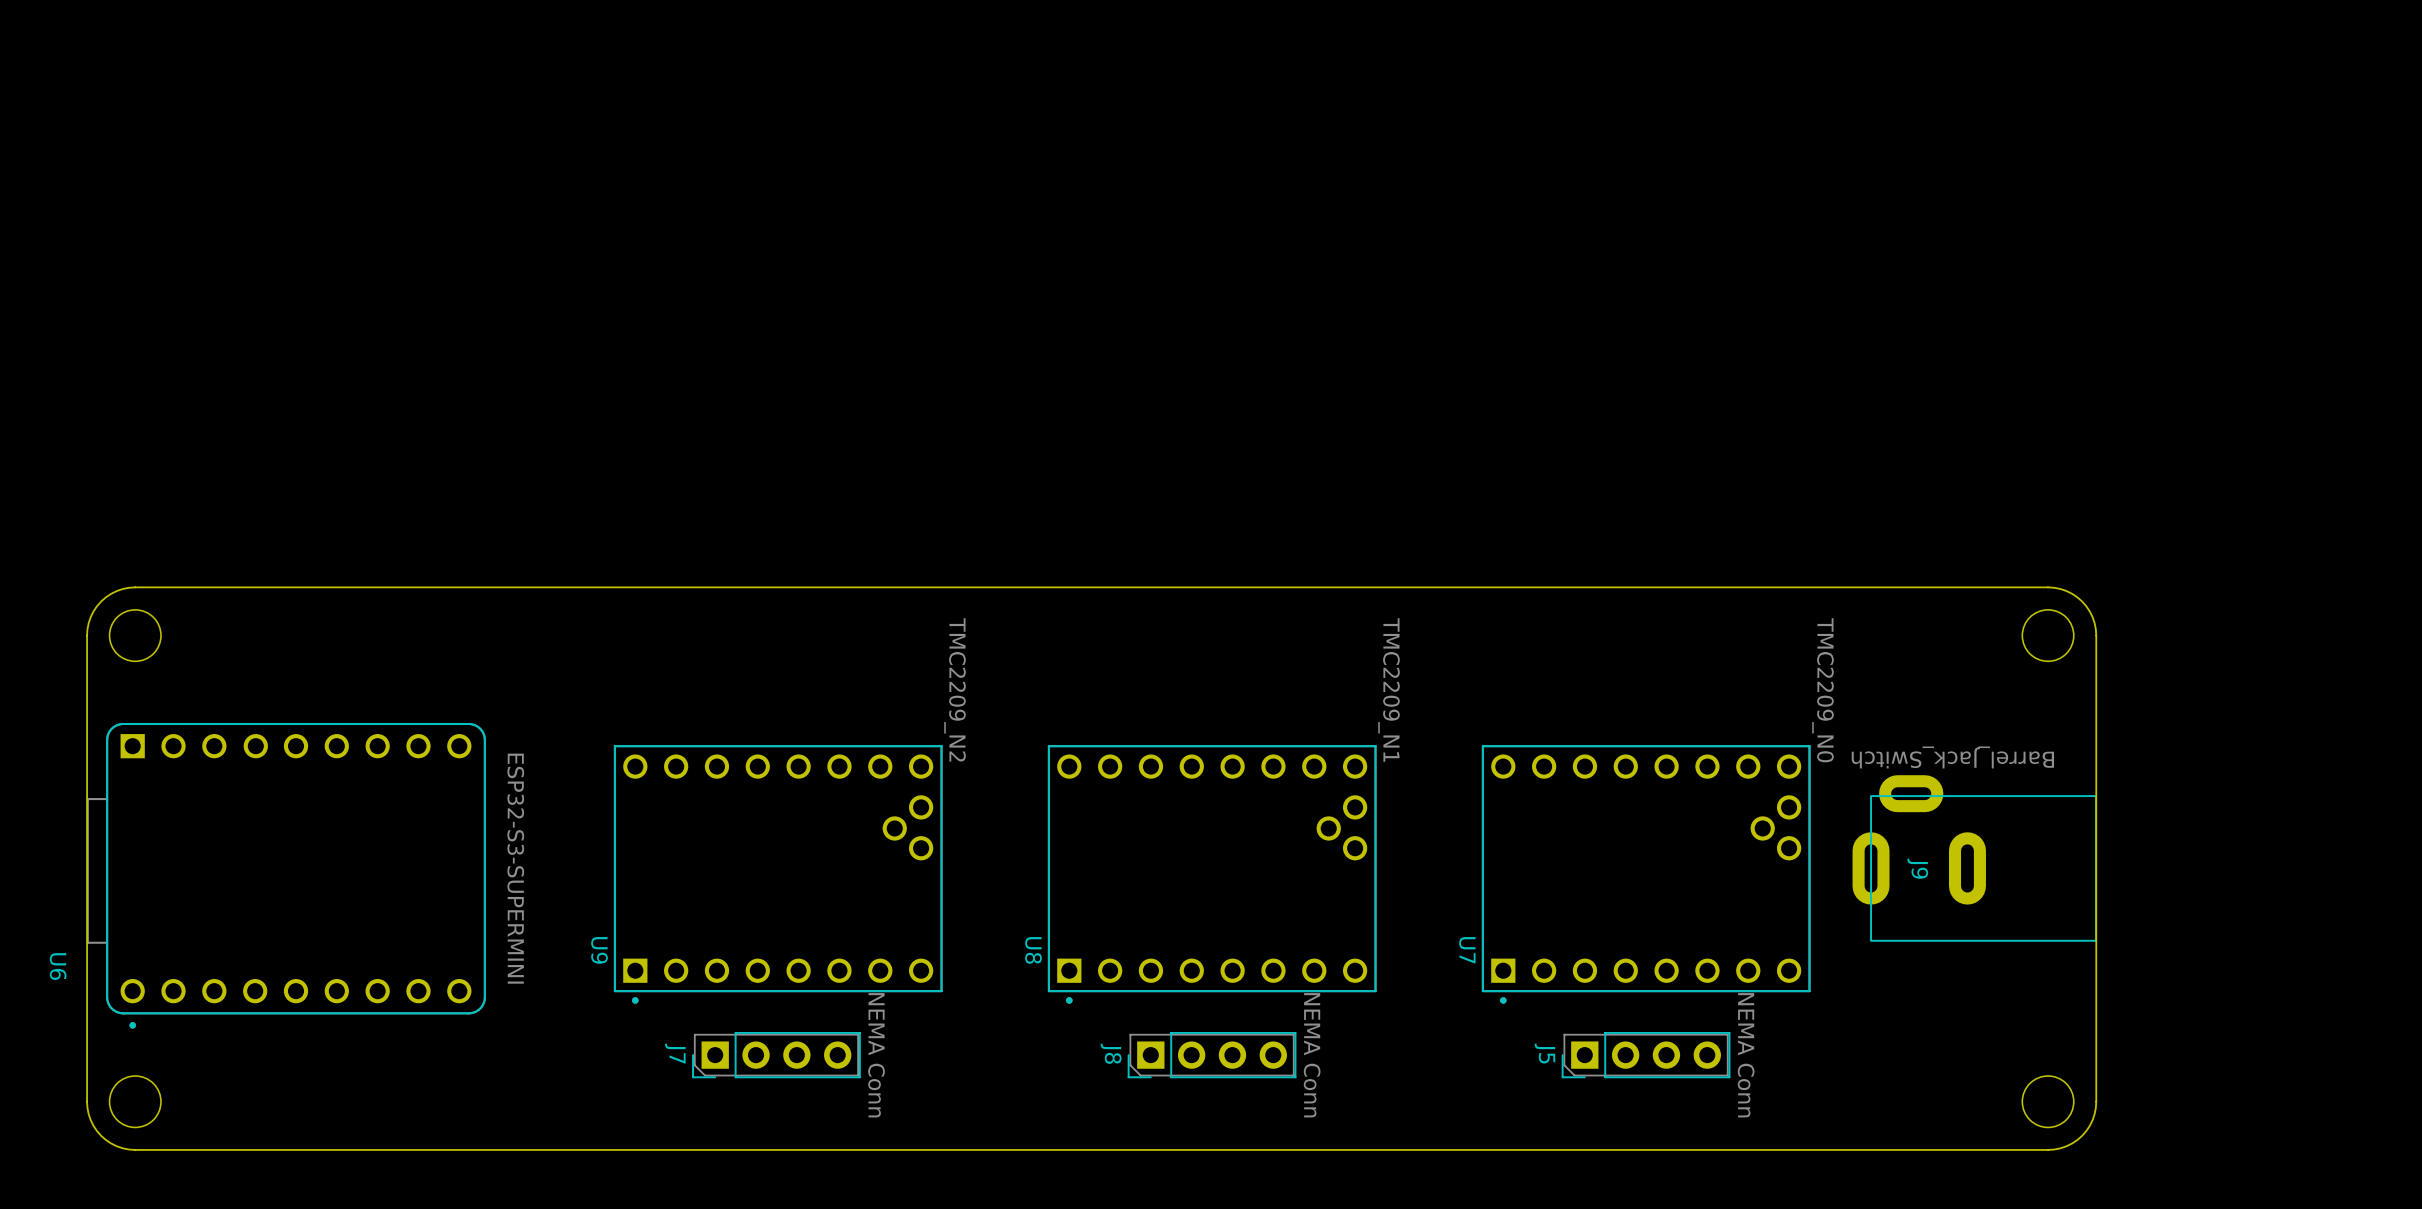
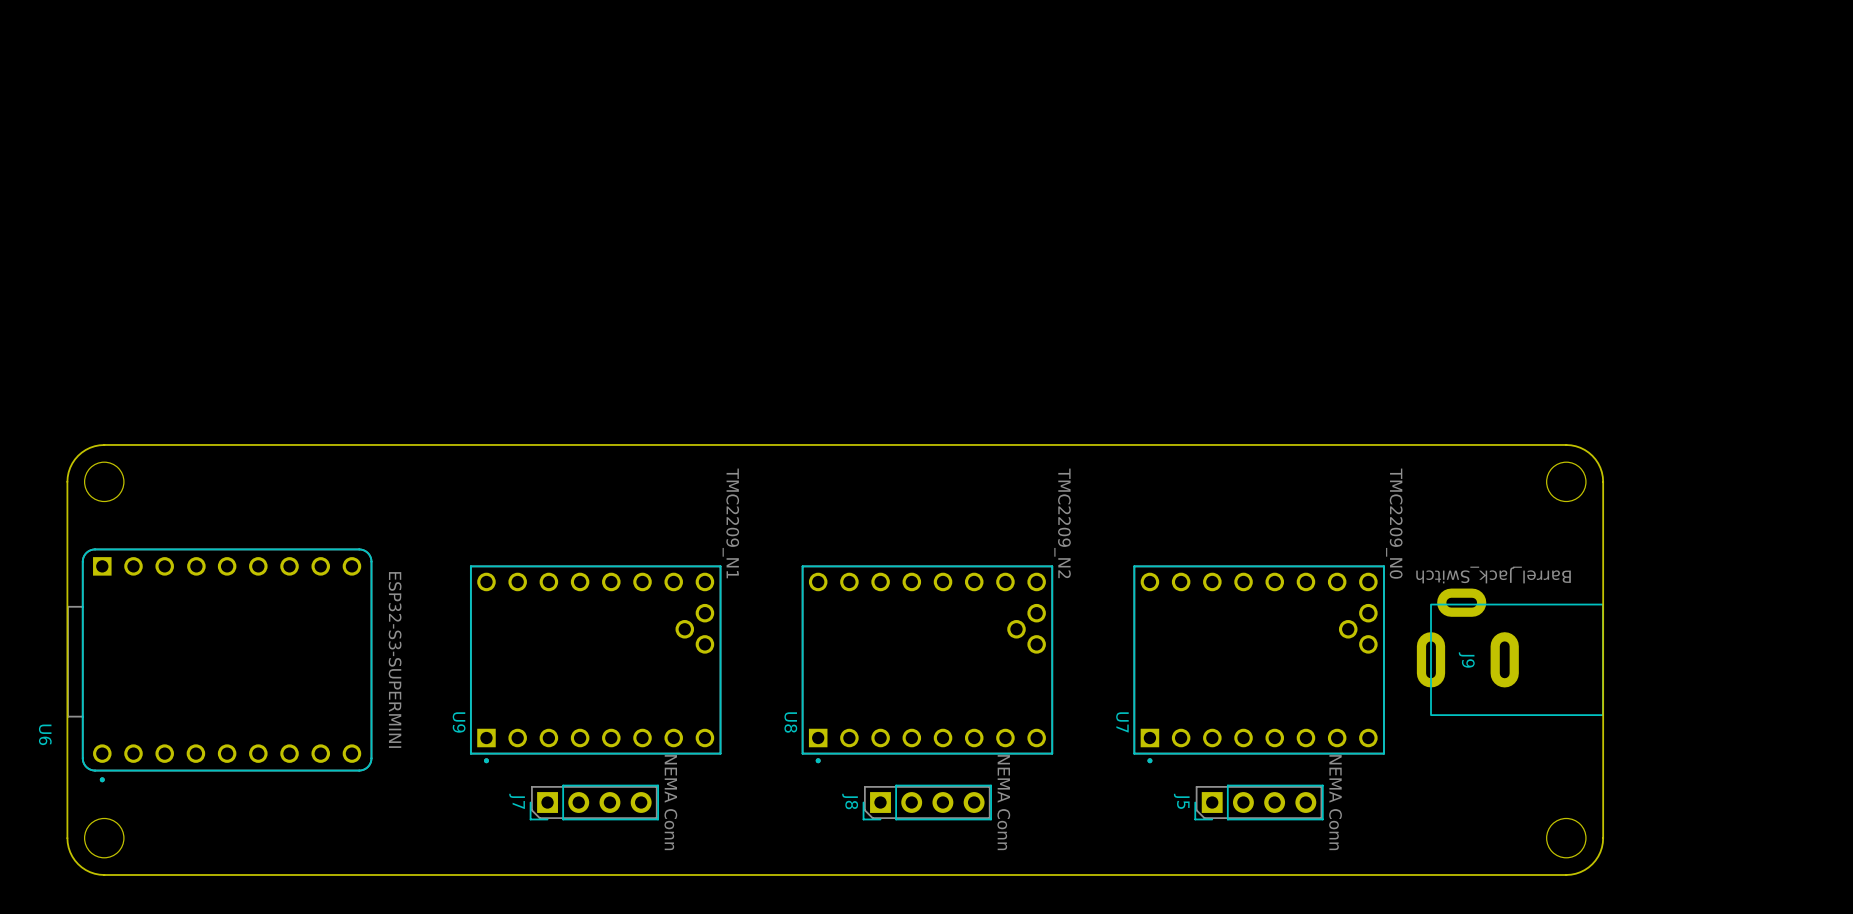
U9 value: TMC2209_N2 (955, 689) -> TMC2209_N1 (730, 523)
U8 value: TMC2209_N1 (1389, 689) -> TMC2209_N2 (1062, 523)

